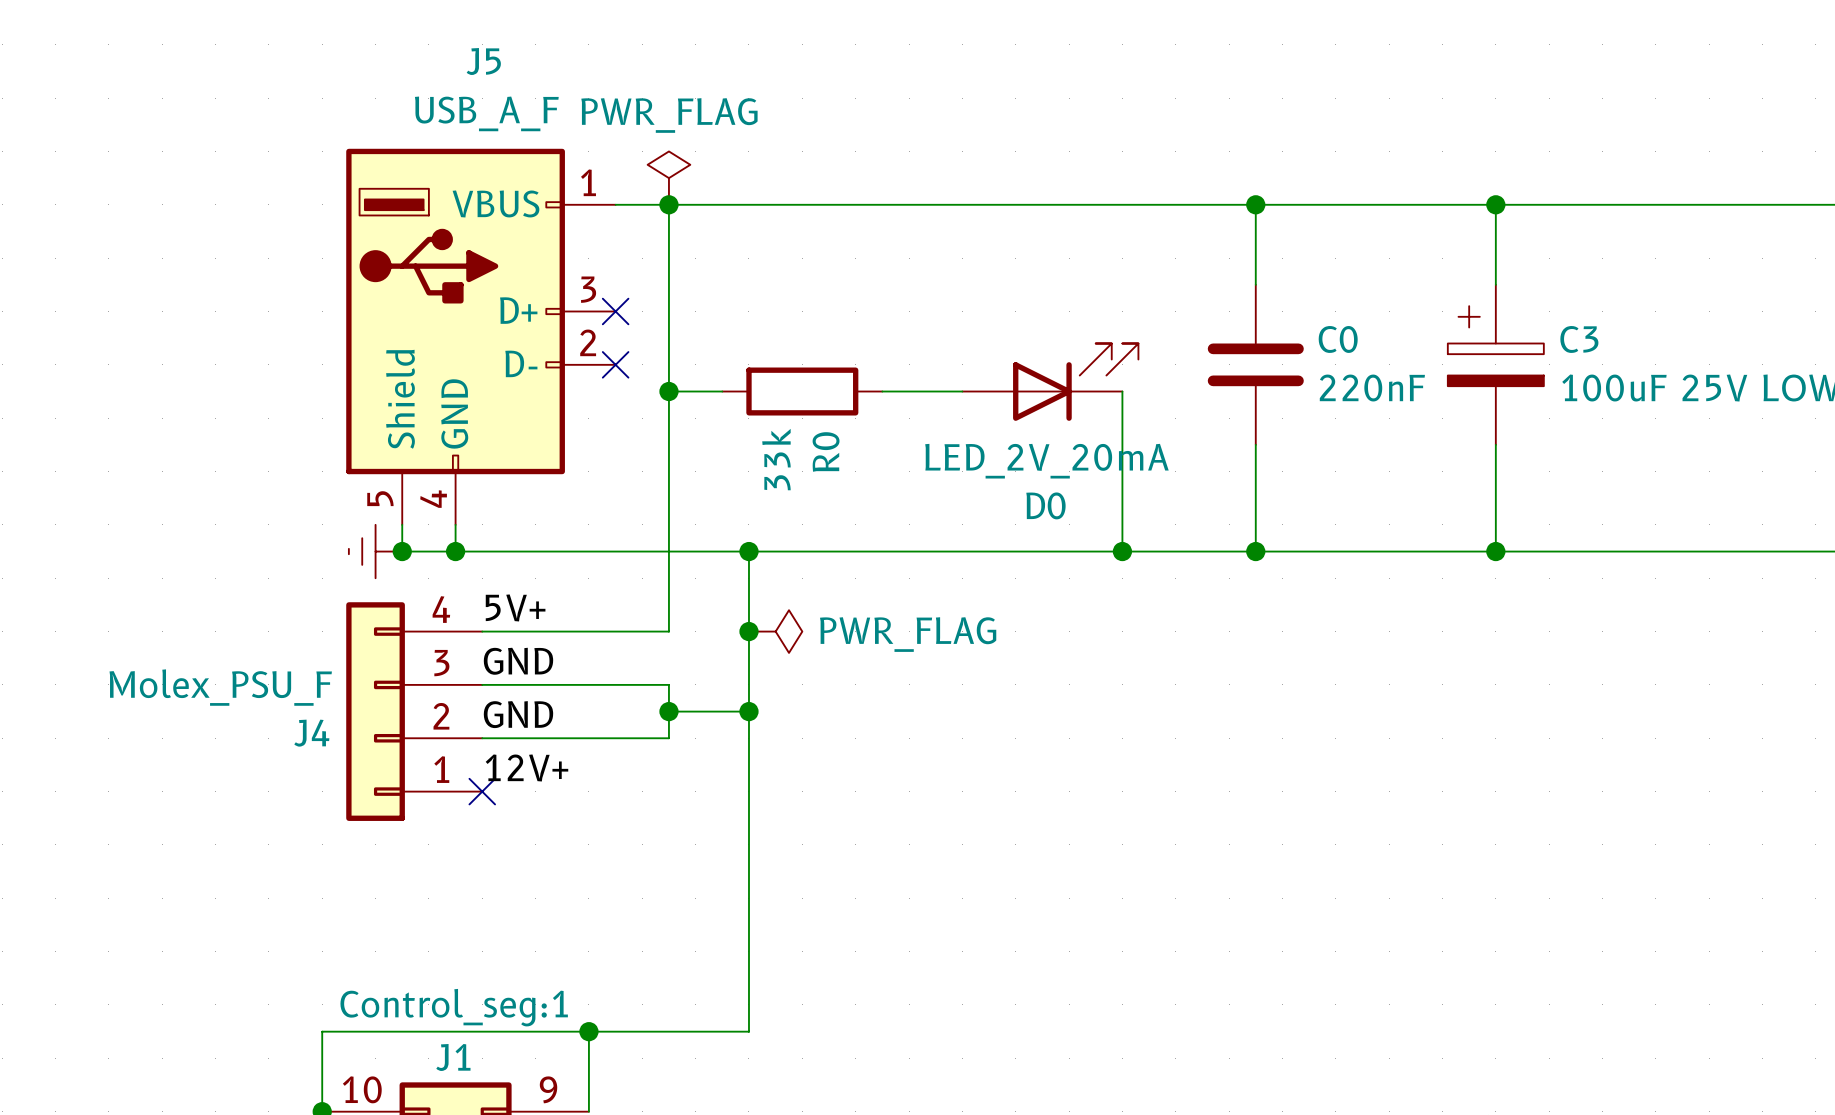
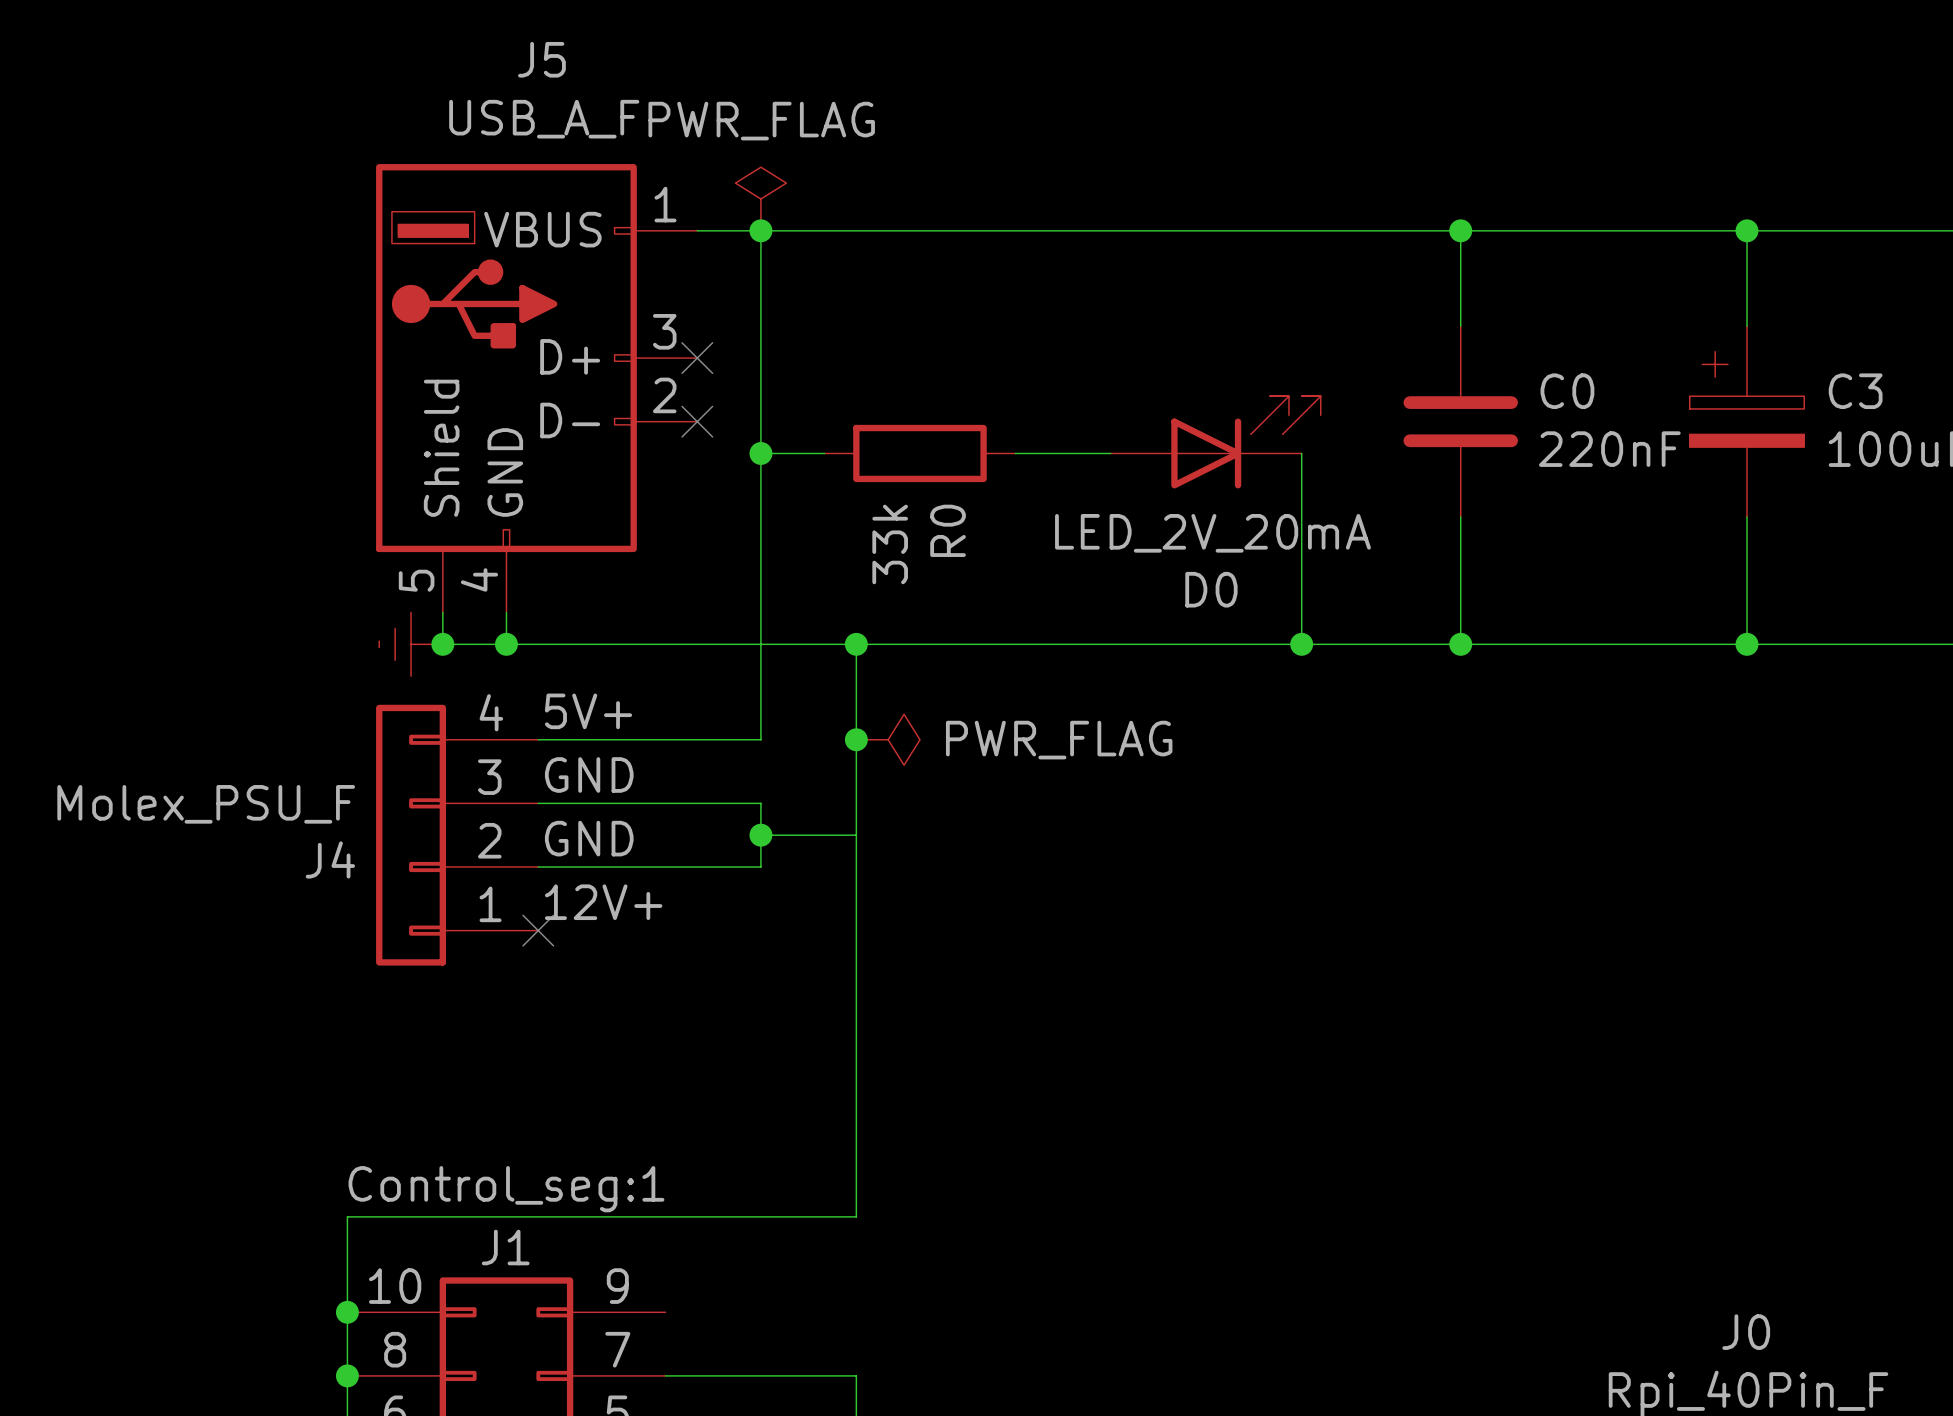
junction: (748, 711) -> none
wire: (588, 1031) (588, 1111) -> none
junction: (588, 1031) -> none

